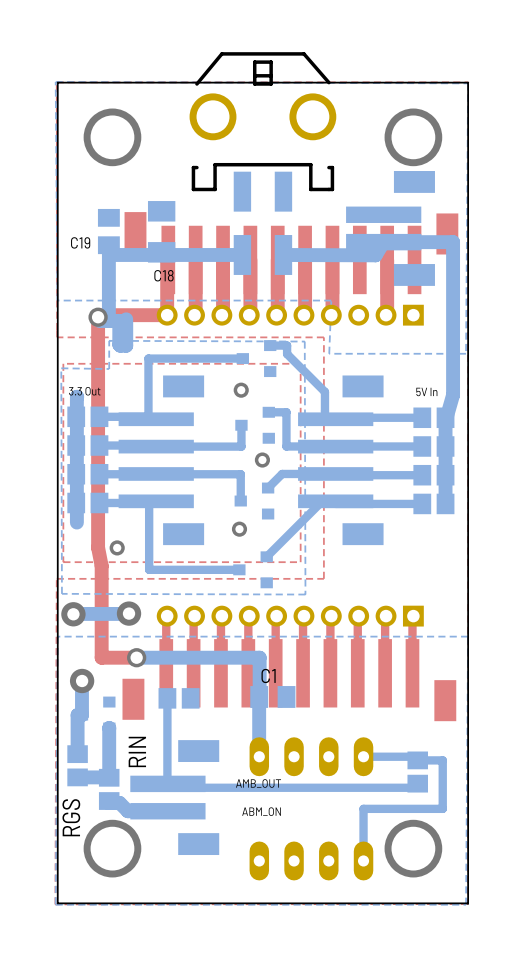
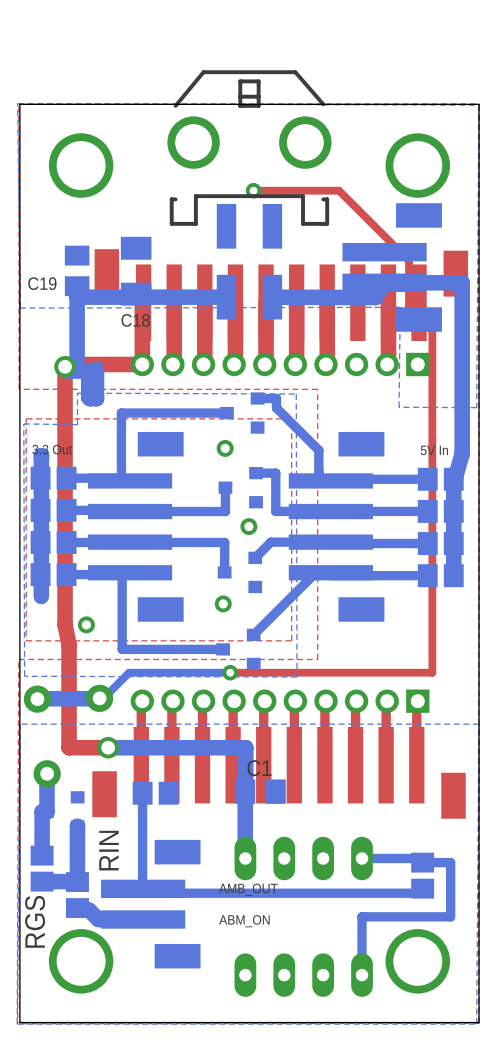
bottom zone outline: (55, 82) (57, 300) (331, 300) (329, 353) (466, 353) -> (17, 103) (20, 308) (400, 307) (399, 407) (476, 407)
top track: none -> (253, 190) (339, 190) (409, 260) (409, 307) (432, 330) (432, 672) (230, 672)
via: none -> (253, 190)
bottom track: none -> (230, 672) (129, 672) (105, 696) (99, 698)
via: none -> (230, 672)

